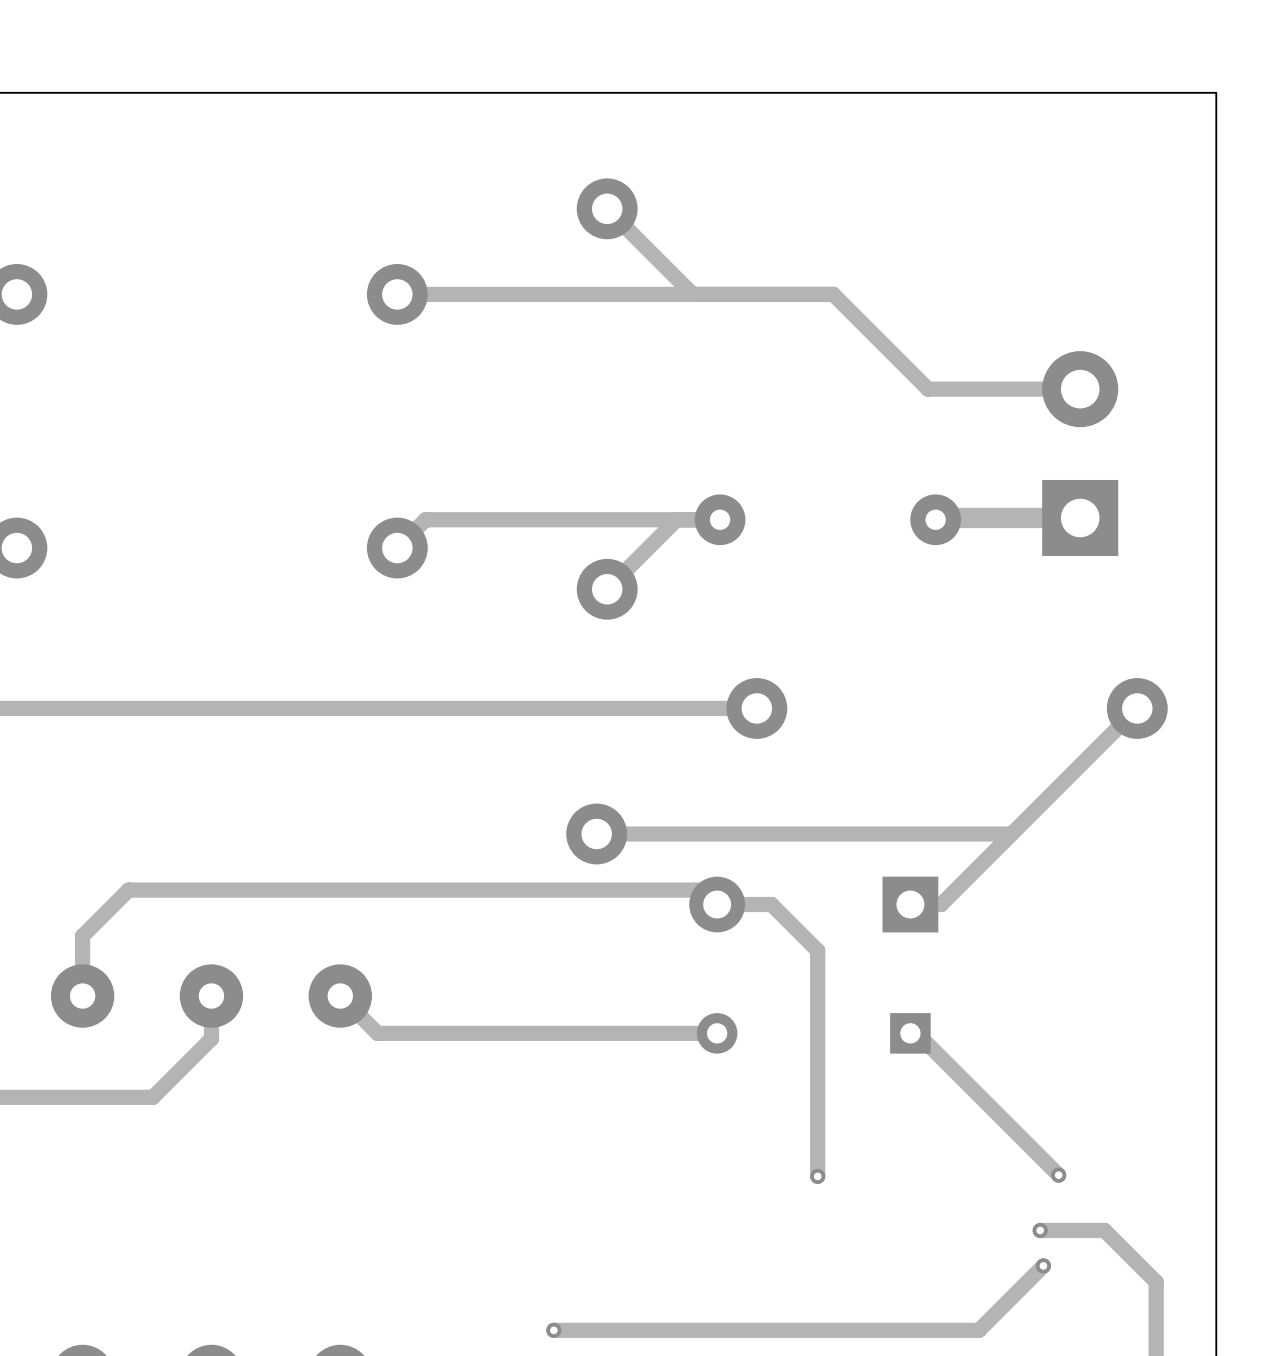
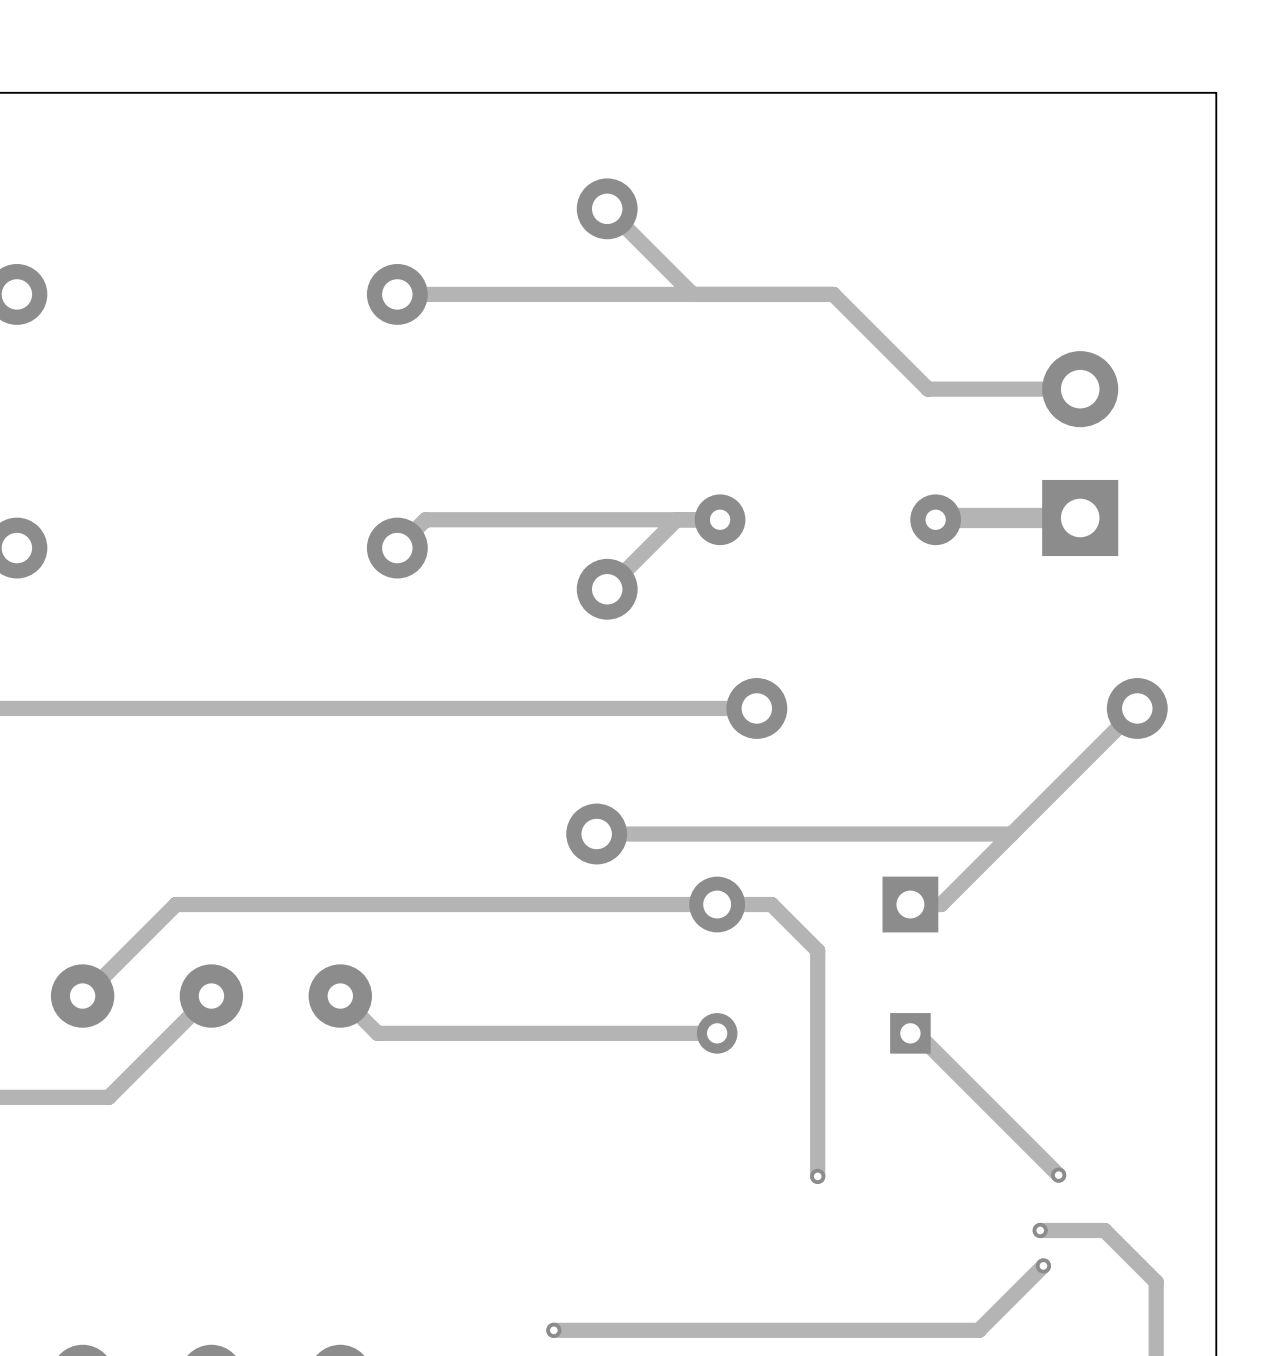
track: (717, 904) (702, 890) (128, 890) (82, 936) (82, 996) -> (717, 904) (176, 904) (82, 996)
track: (211, 996) (211, 1038) (152, 1097) (108, 1097) -> (211, 996) (108, 1097)

